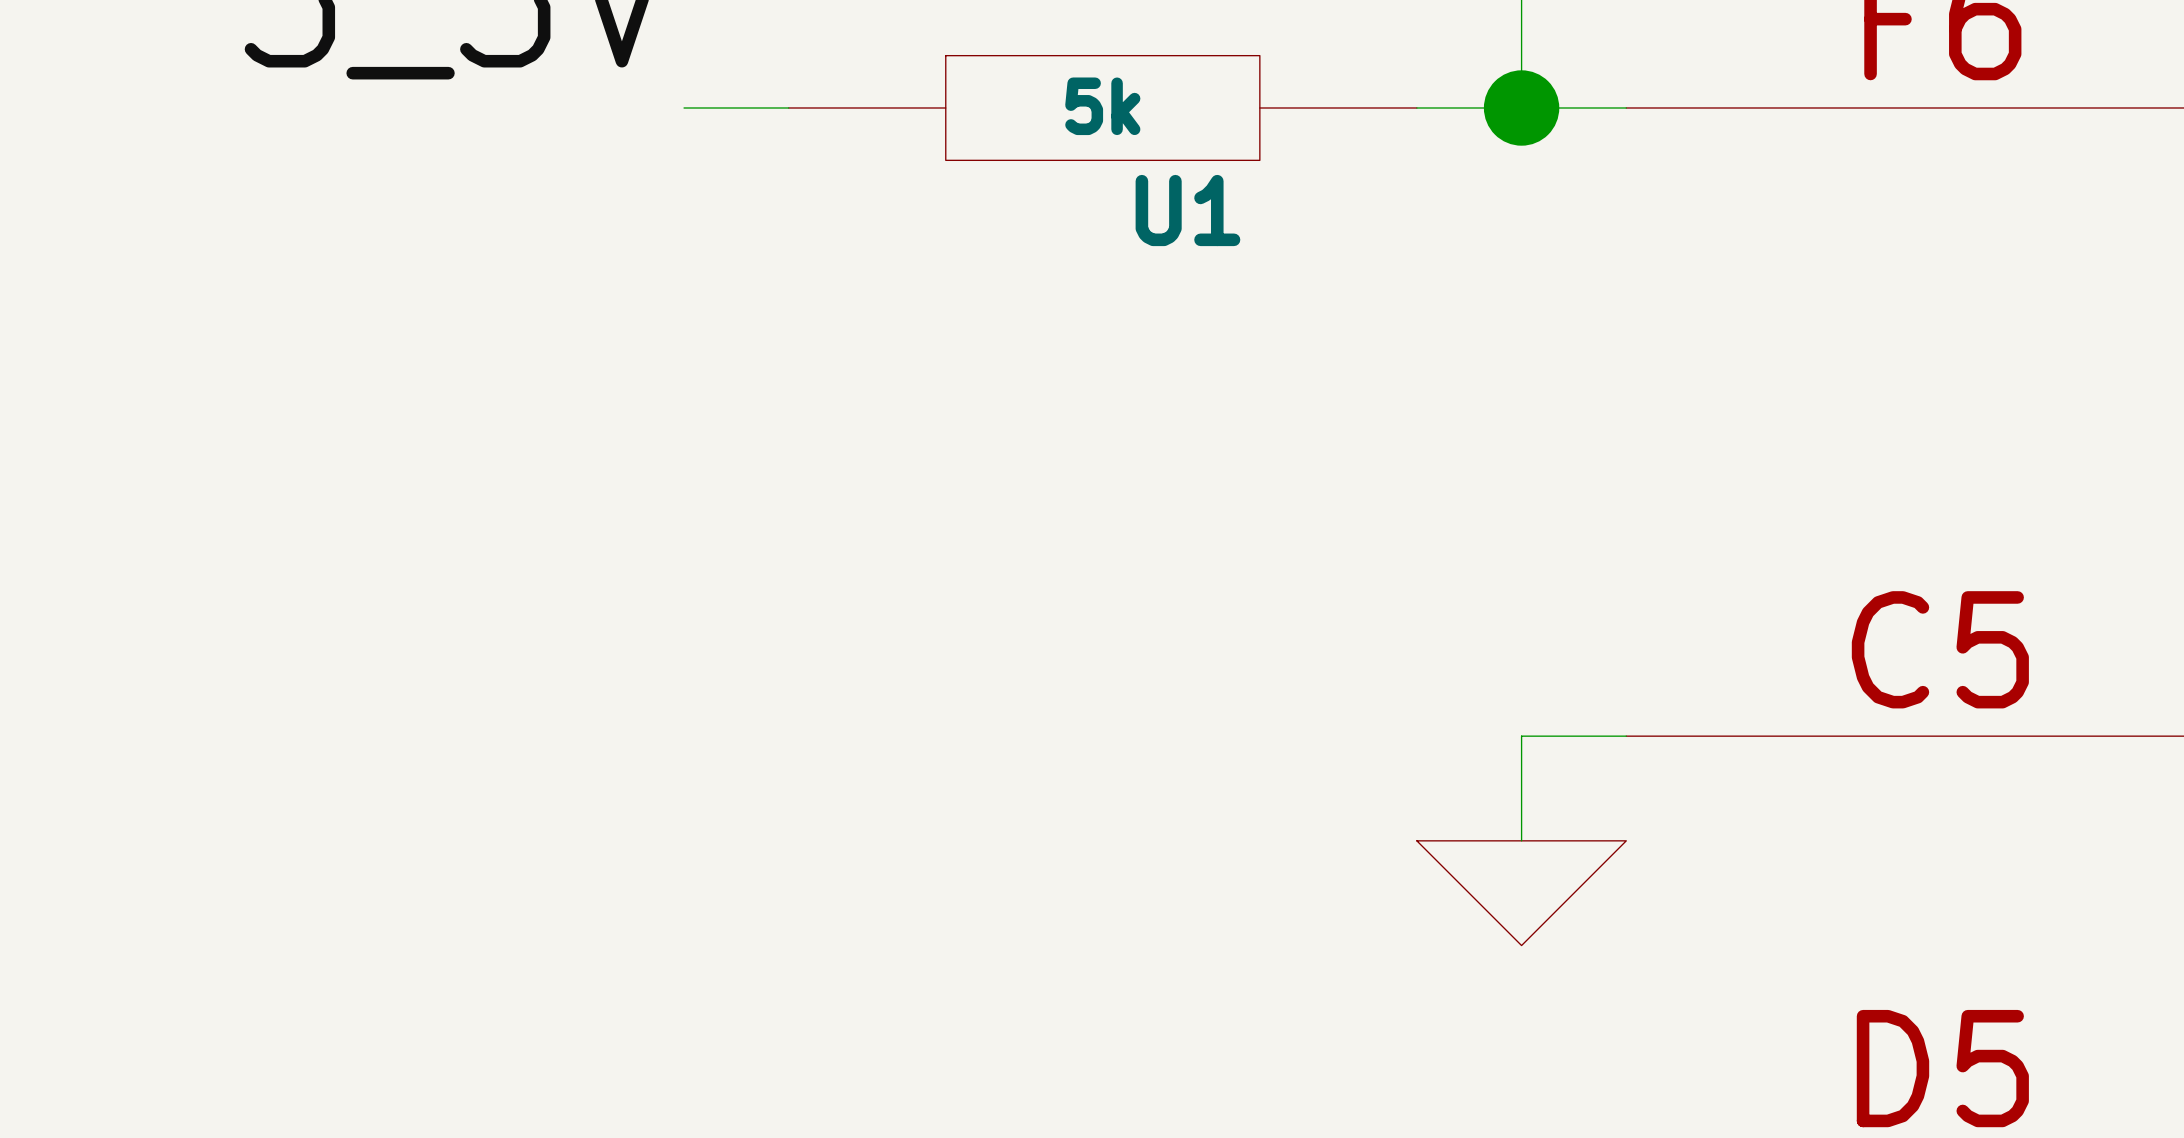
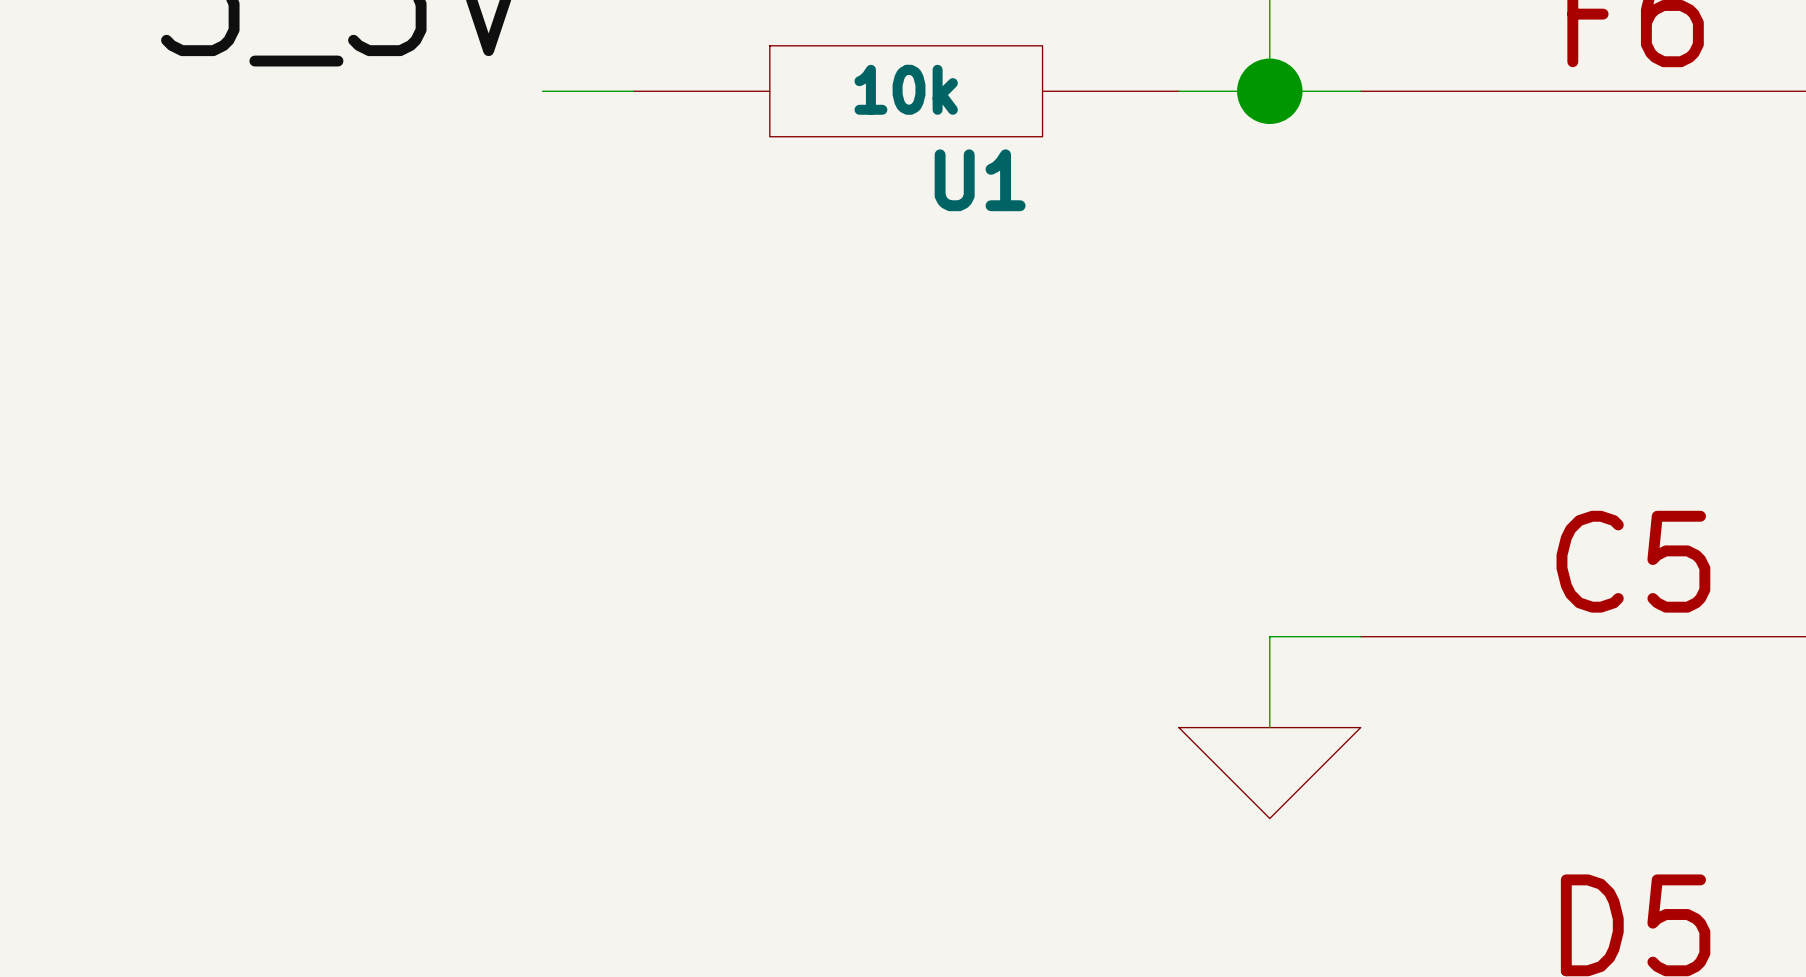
U1 value: 5k (1102, 106) -> 10k (906, 89)

